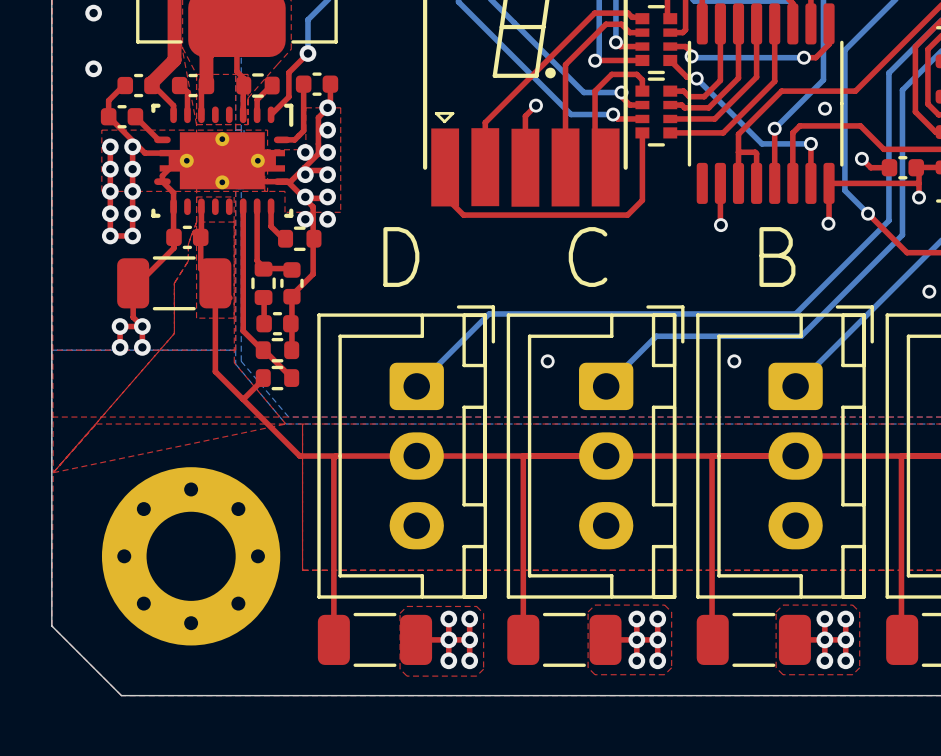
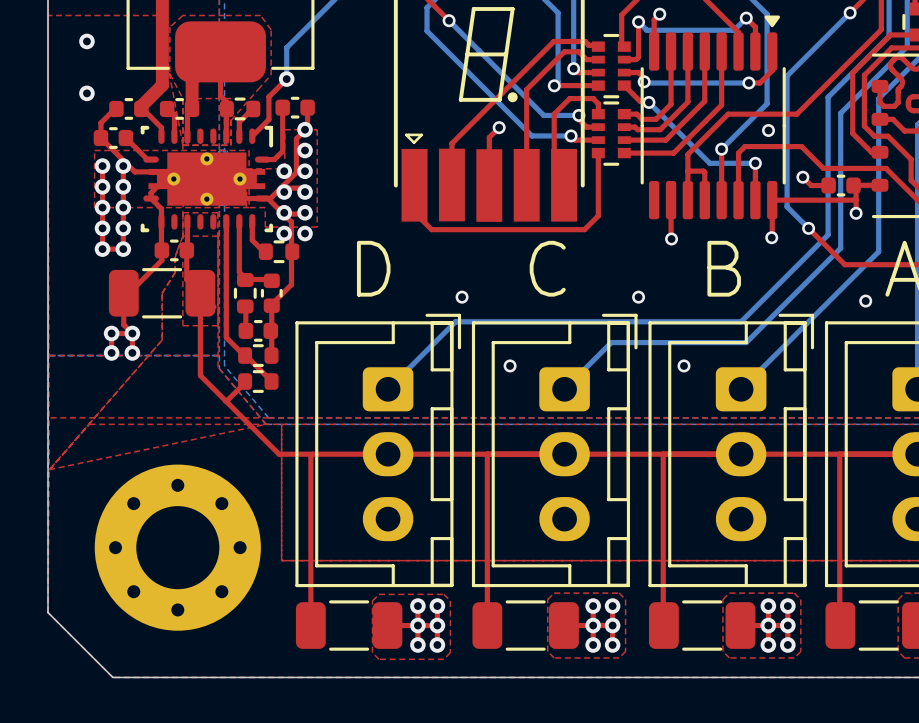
via: none -> (462, 297)
via: none -> (638, 297)

